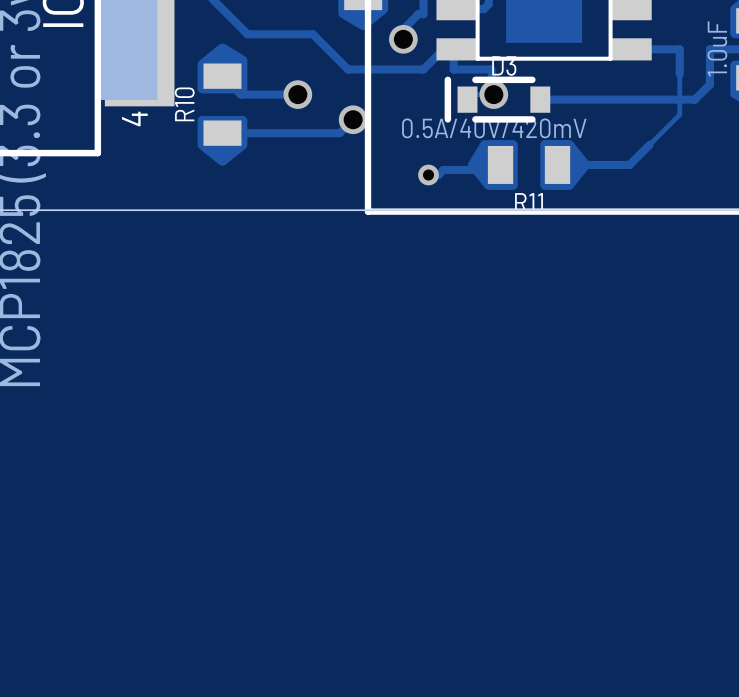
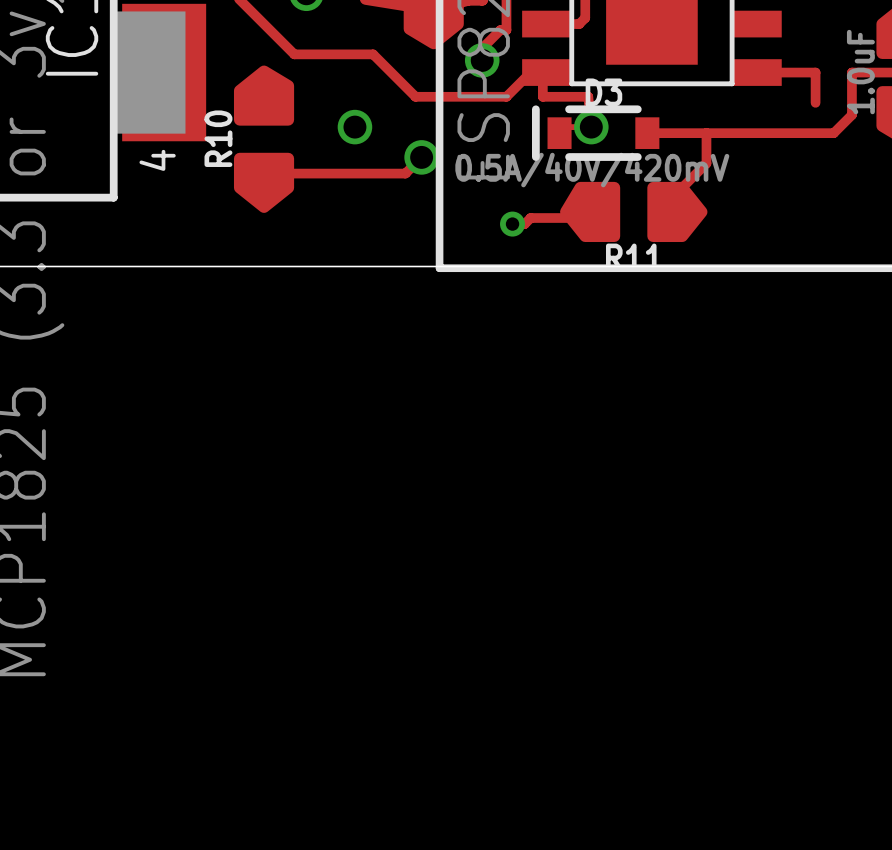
track: (679, 74) (679, 114) (629, 164) (557, 164) -> (706, 133) (706, 163) (668, 201) (668, 211)
track: (222, 76) (240, 94) (297, 94) -> none

